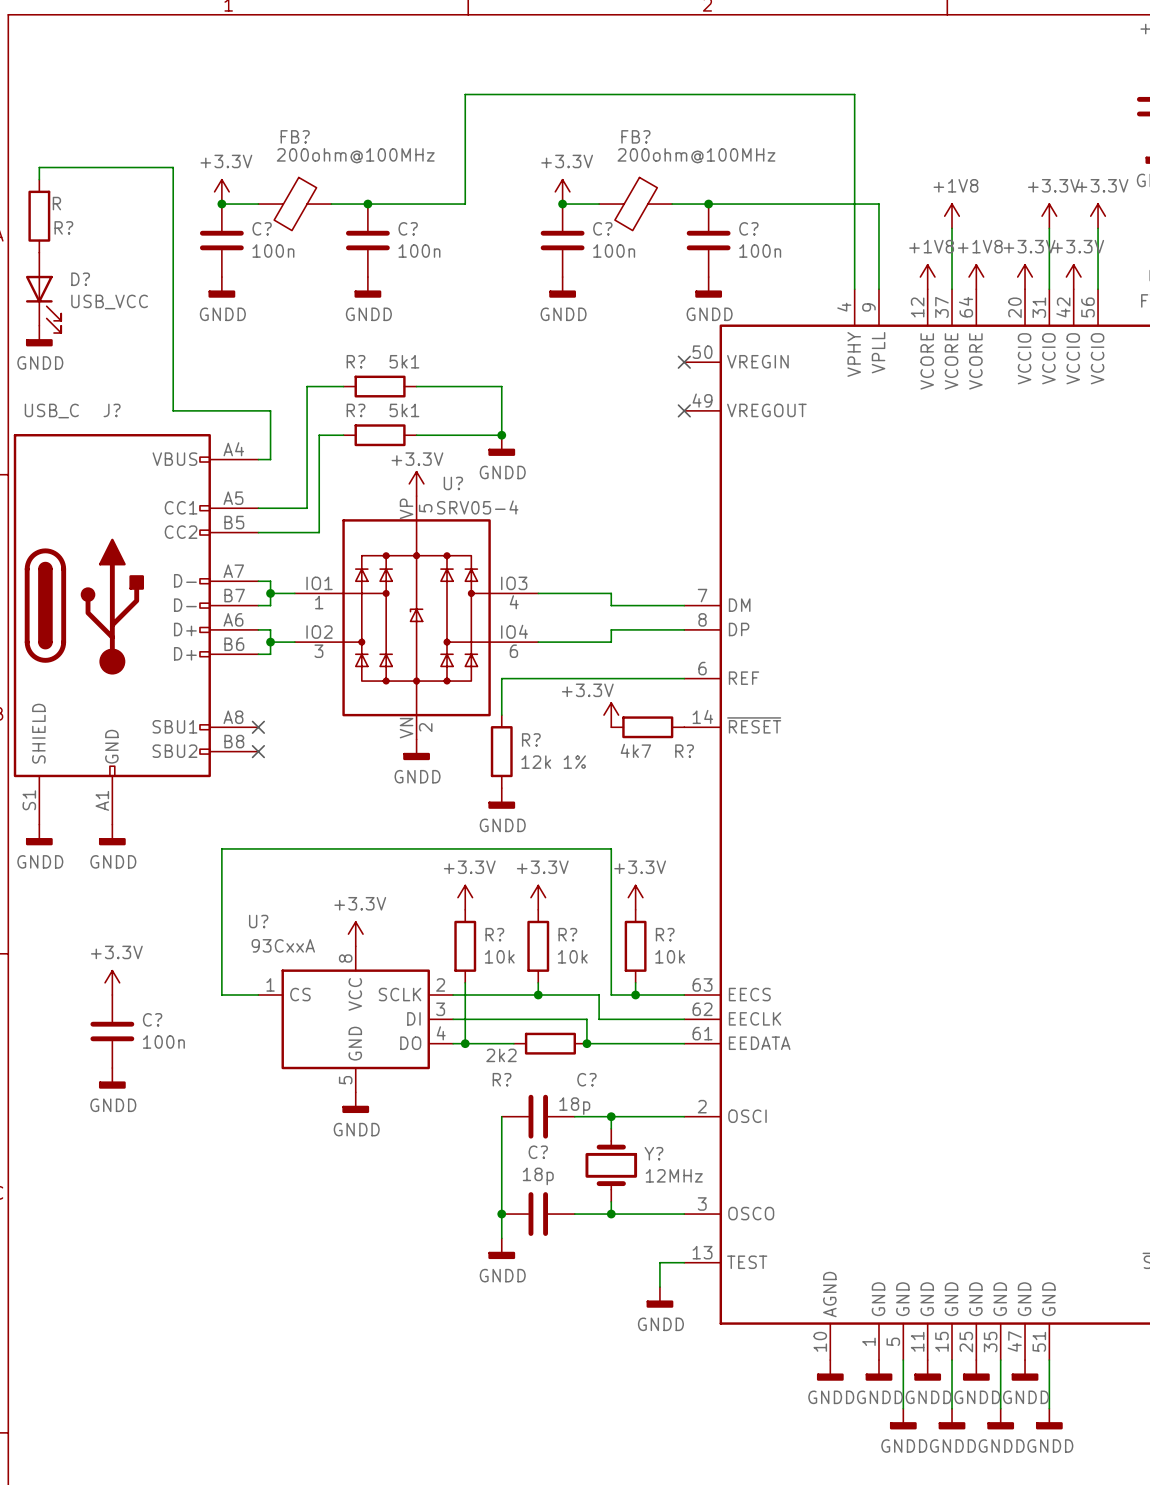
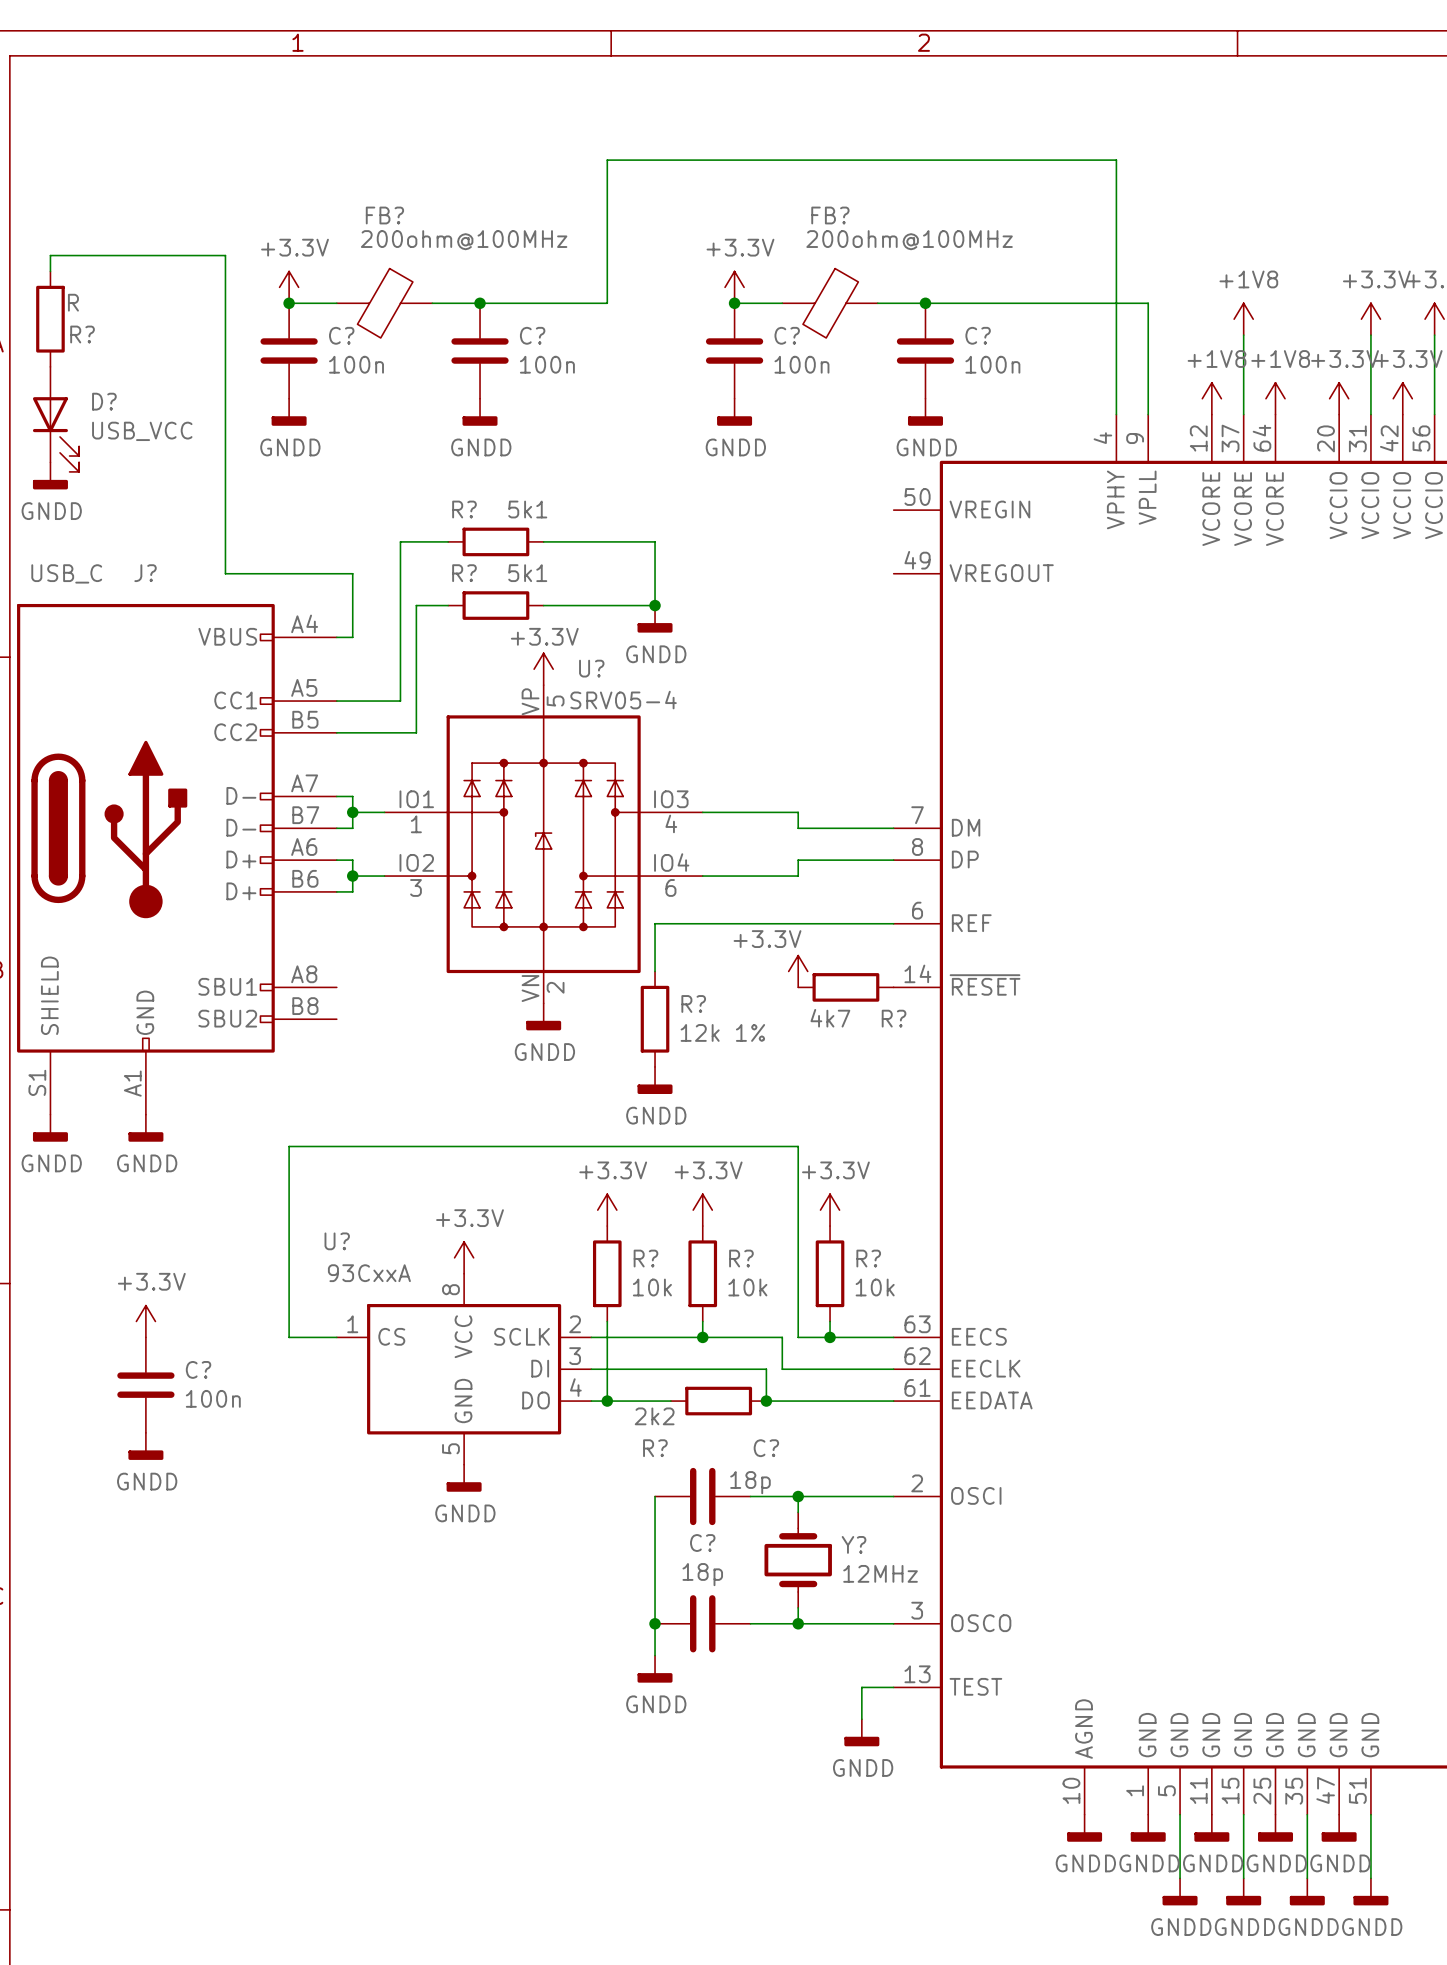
no-connect mark: (684, 362) -> none
no-connect mark: (684, 410) -> none
no-connect mark: (258, 727) -> none
no-connect mark: (258, 751) -> none

